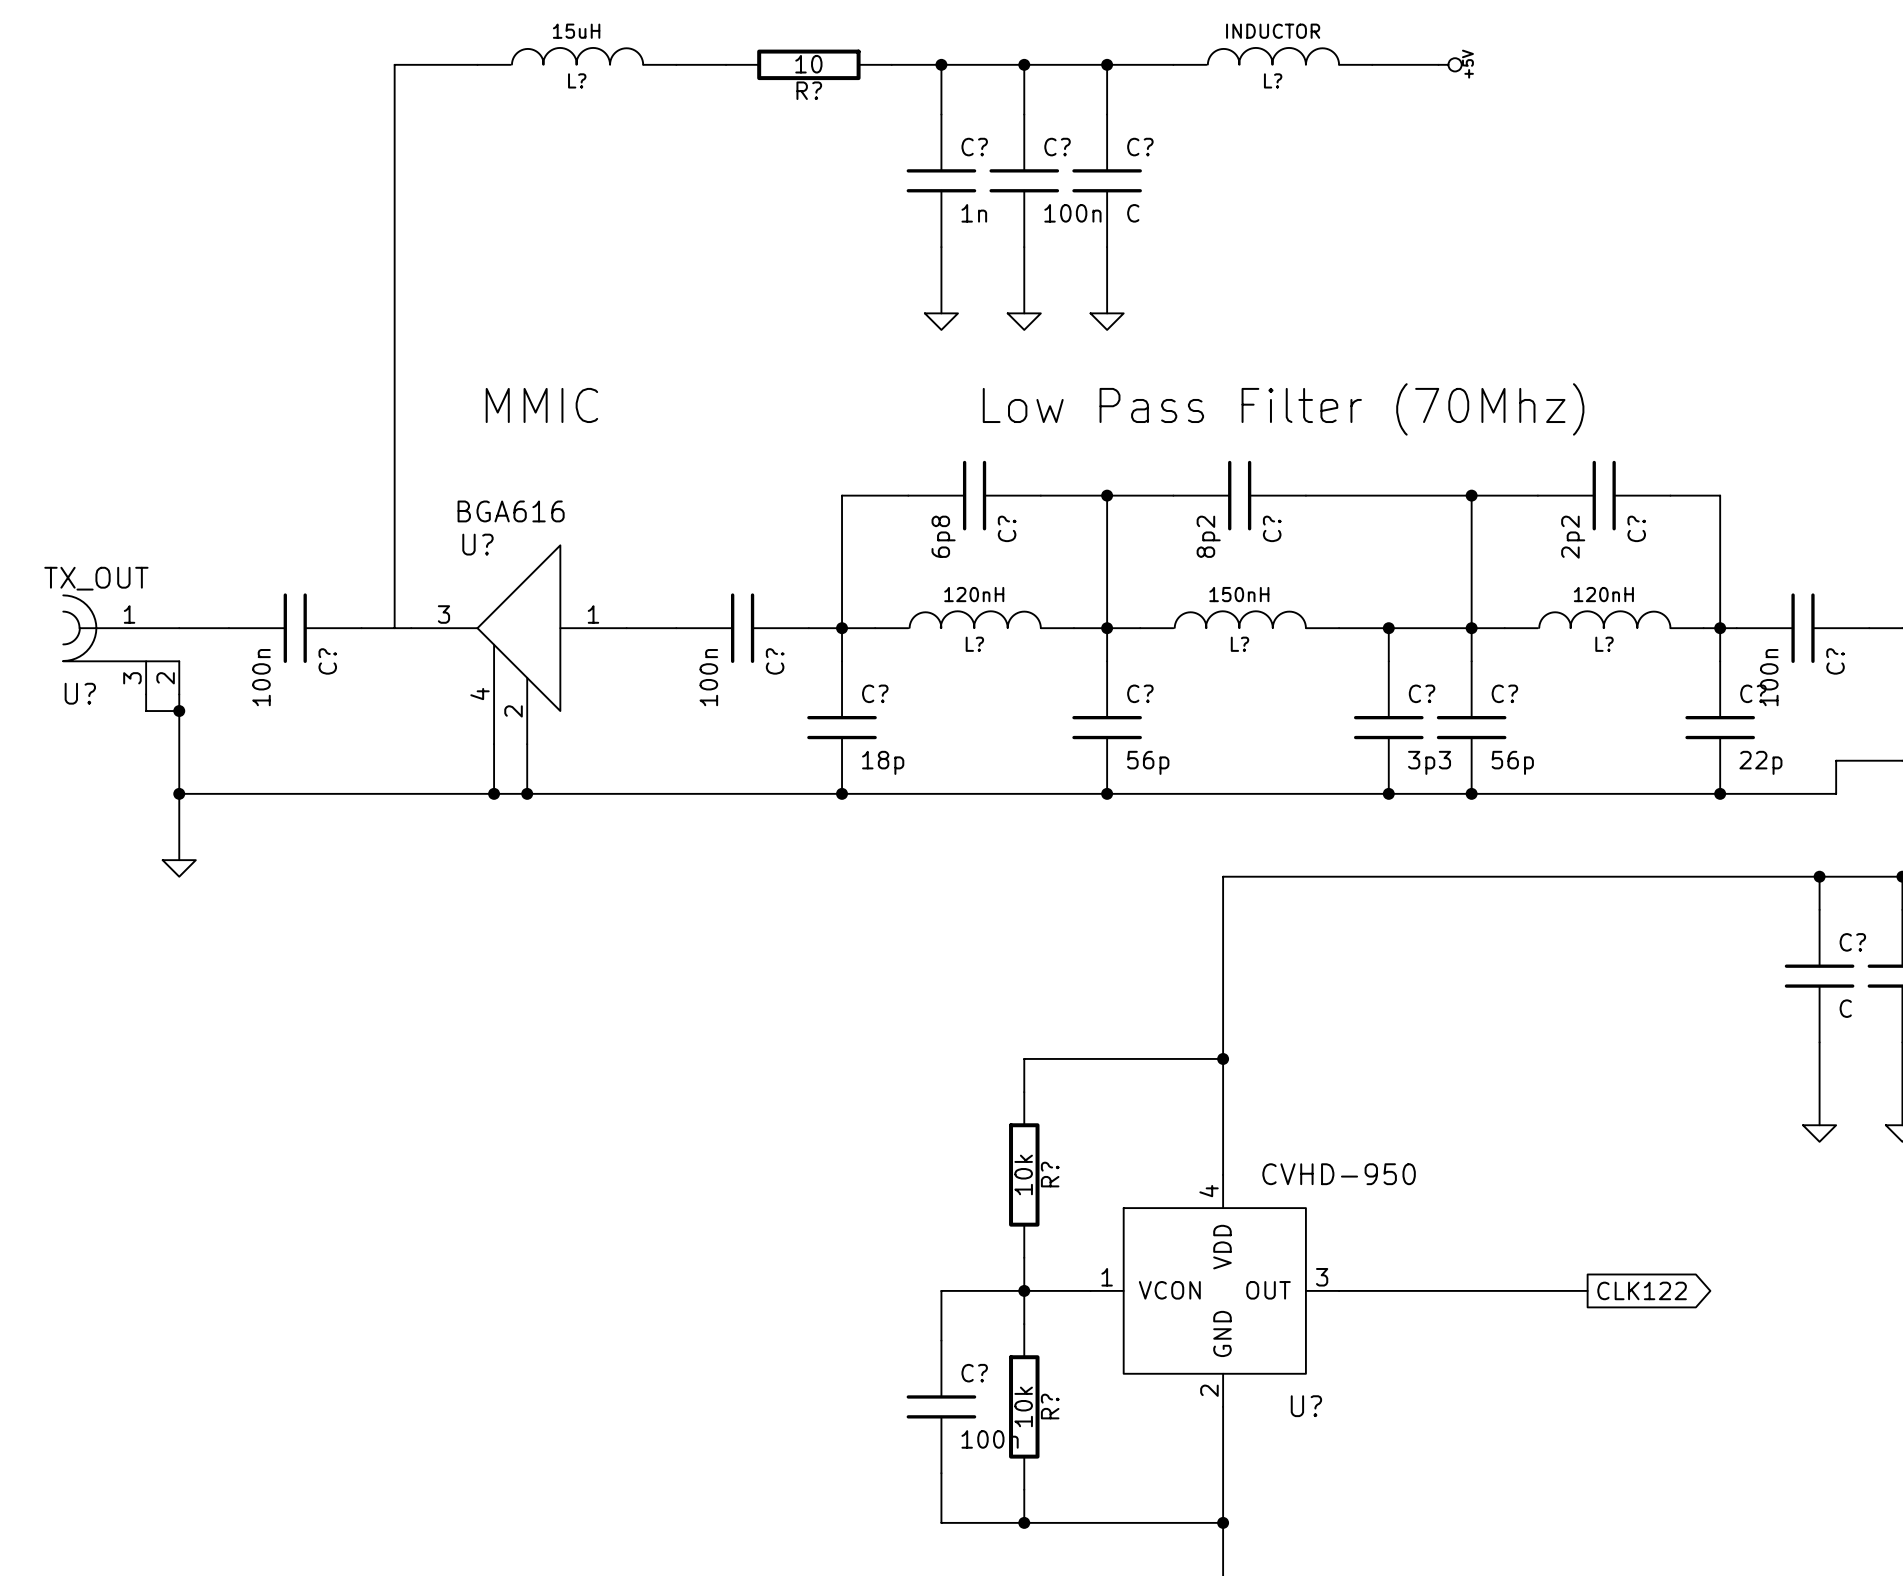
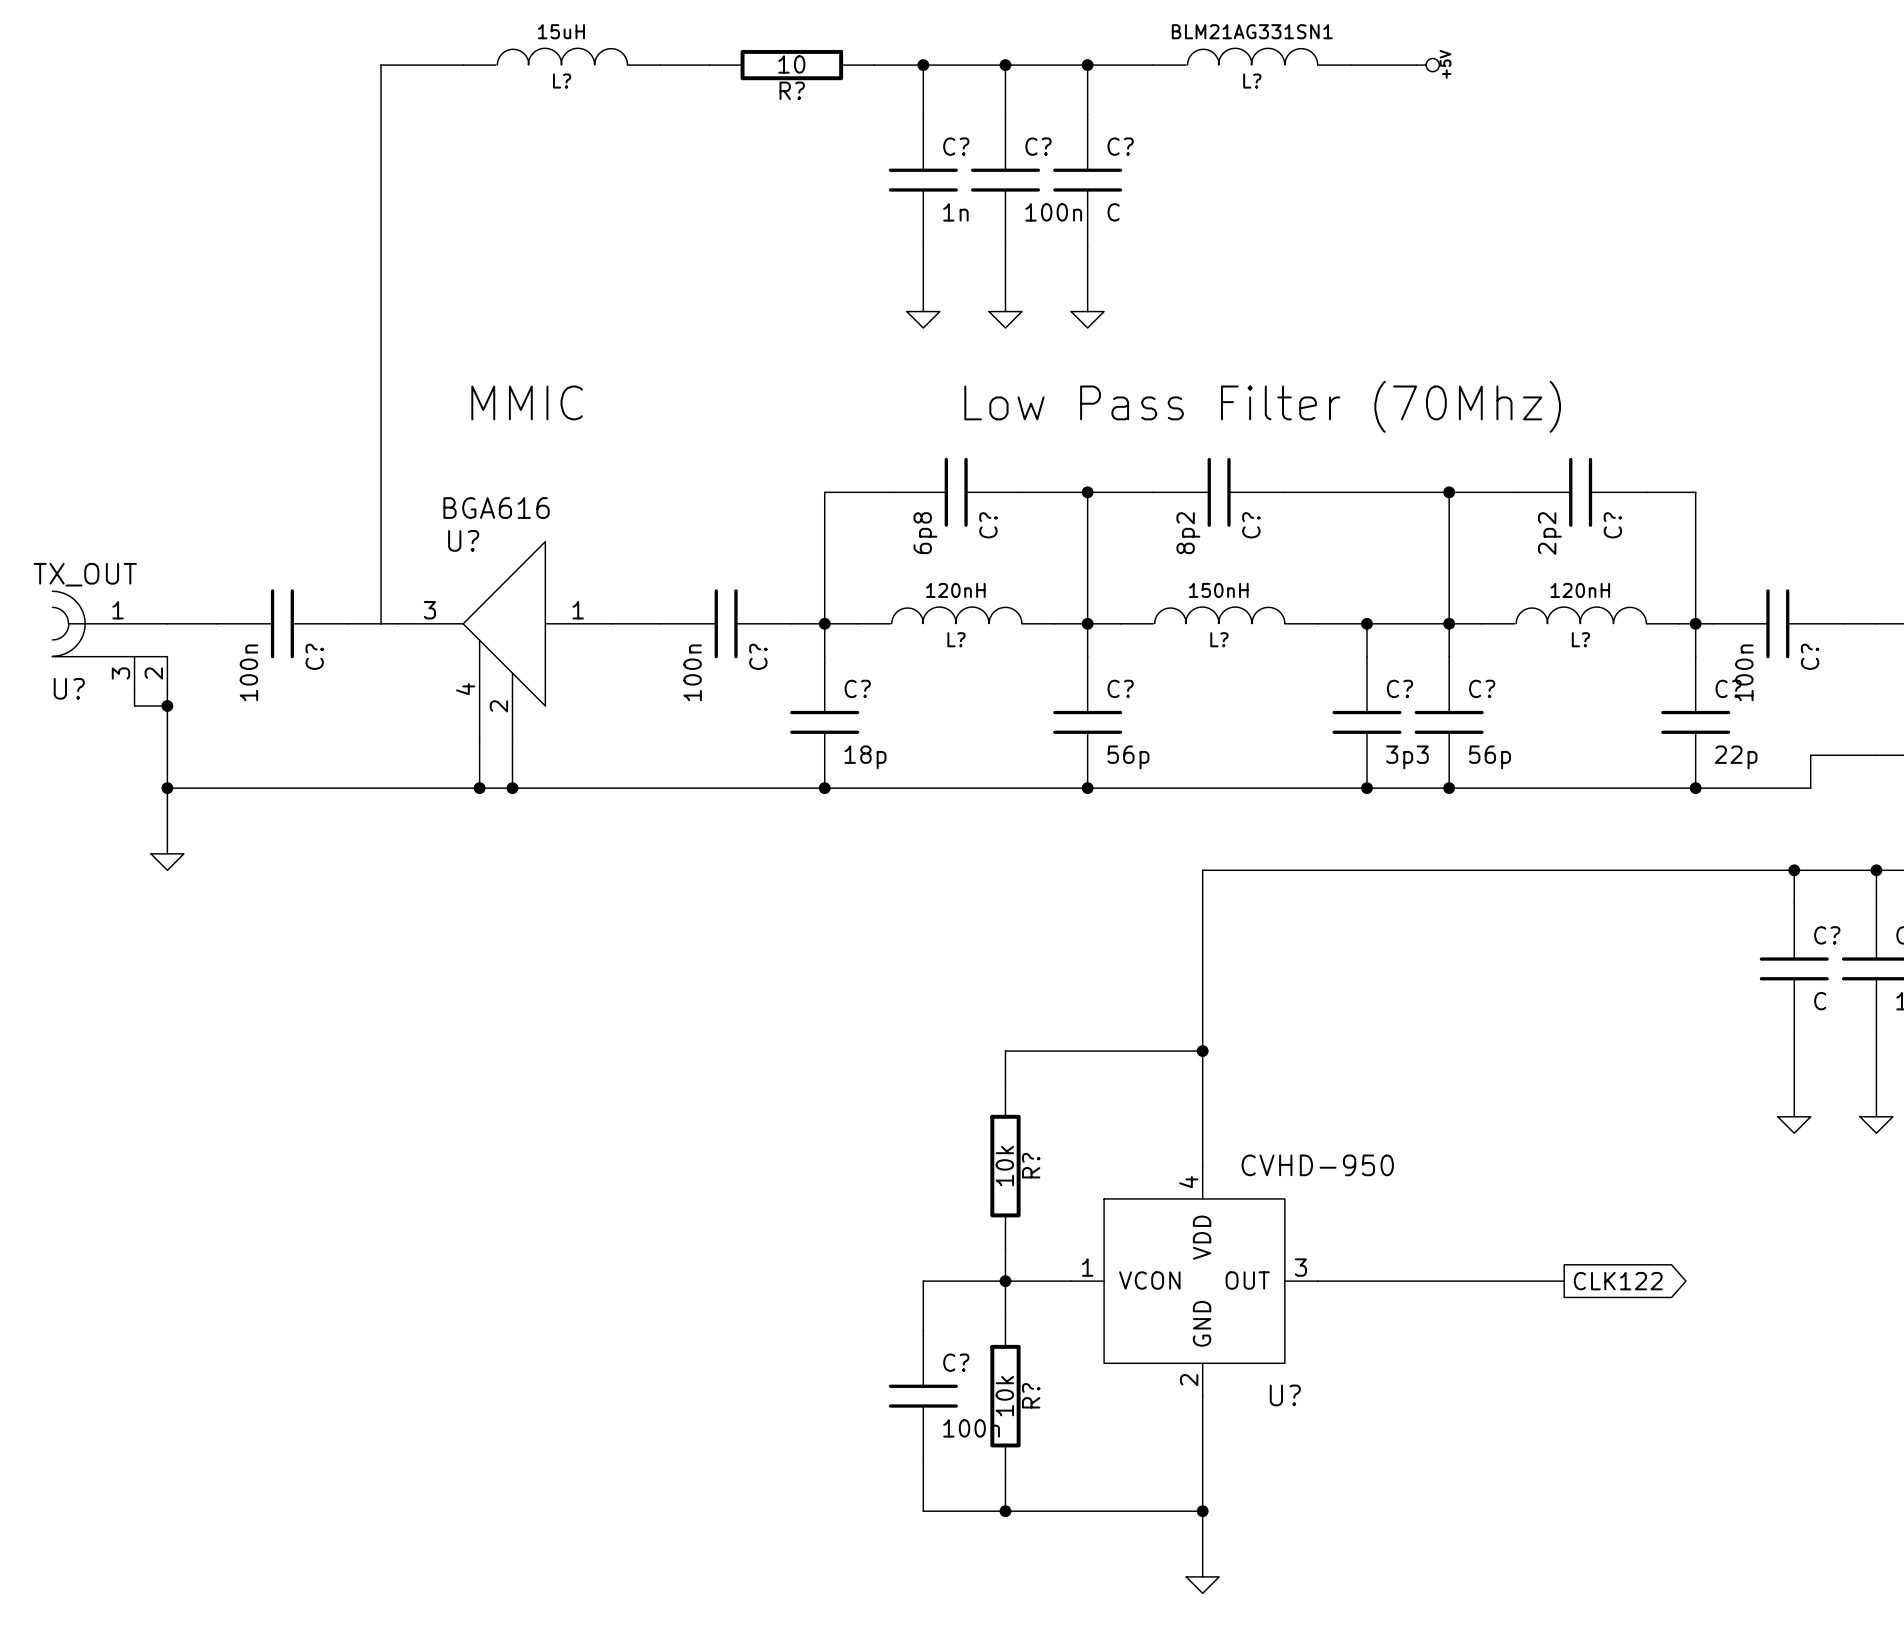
L? value: INDUCTOR (1273, 31) -> BLM21AG331SN1 (1252, 31)

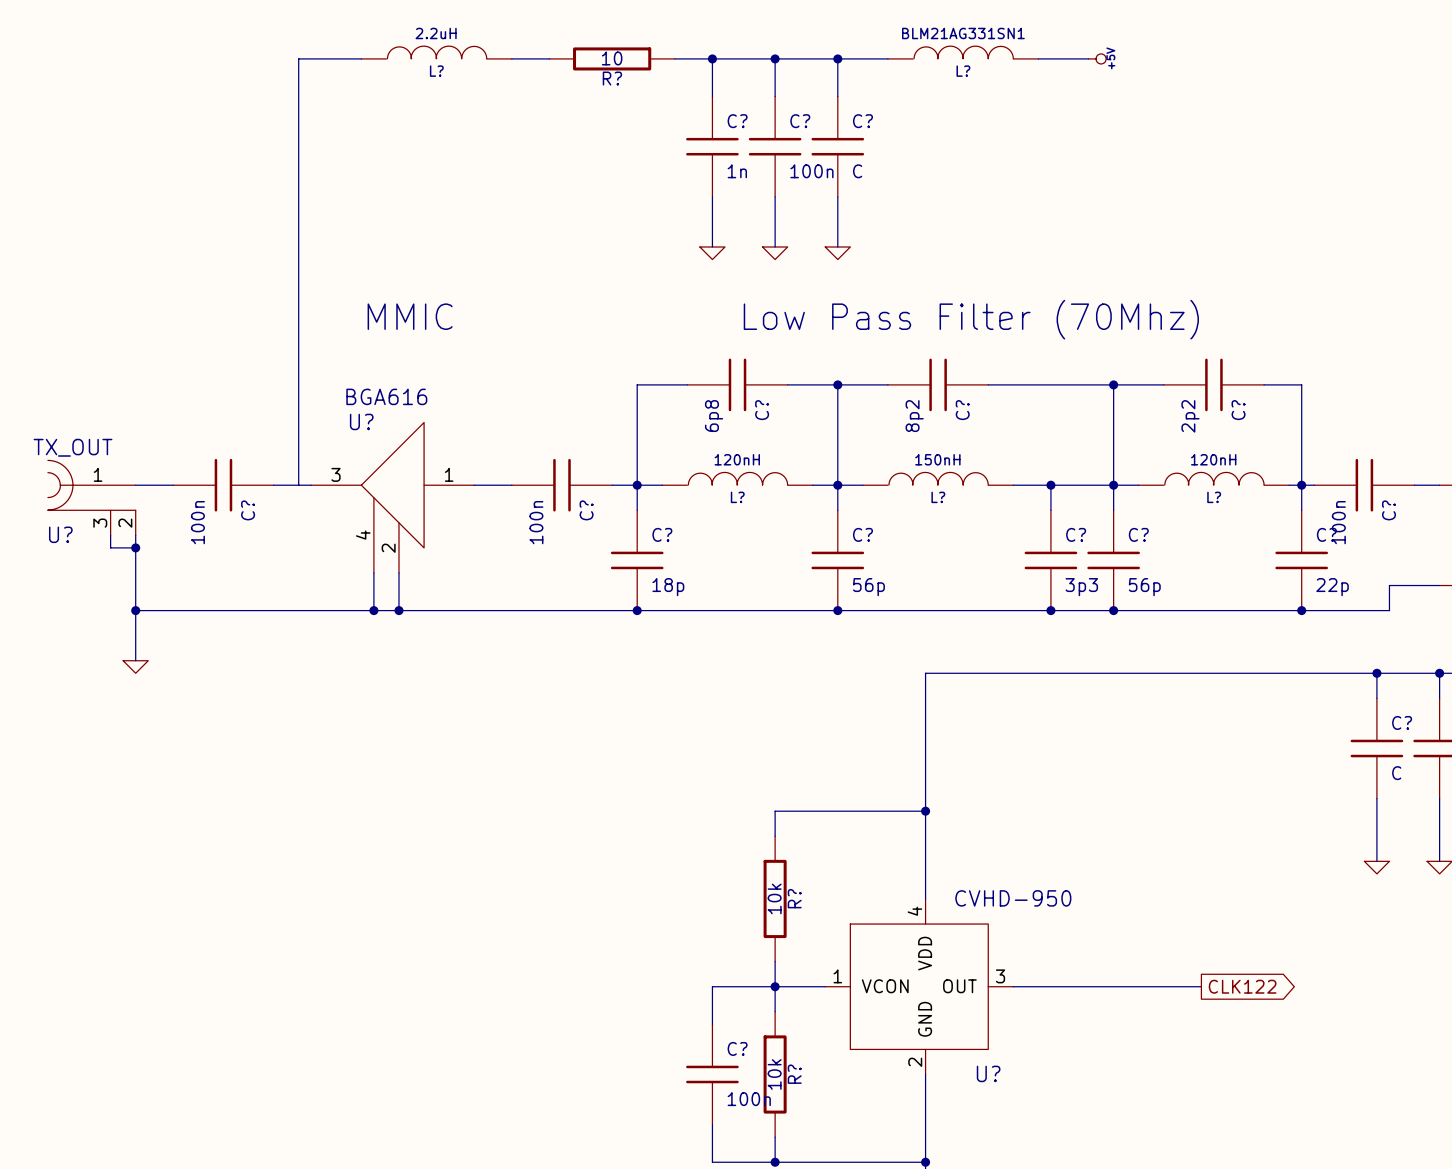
L? value: 15uH (561, 31) -> 2.2uH (436, 33)

